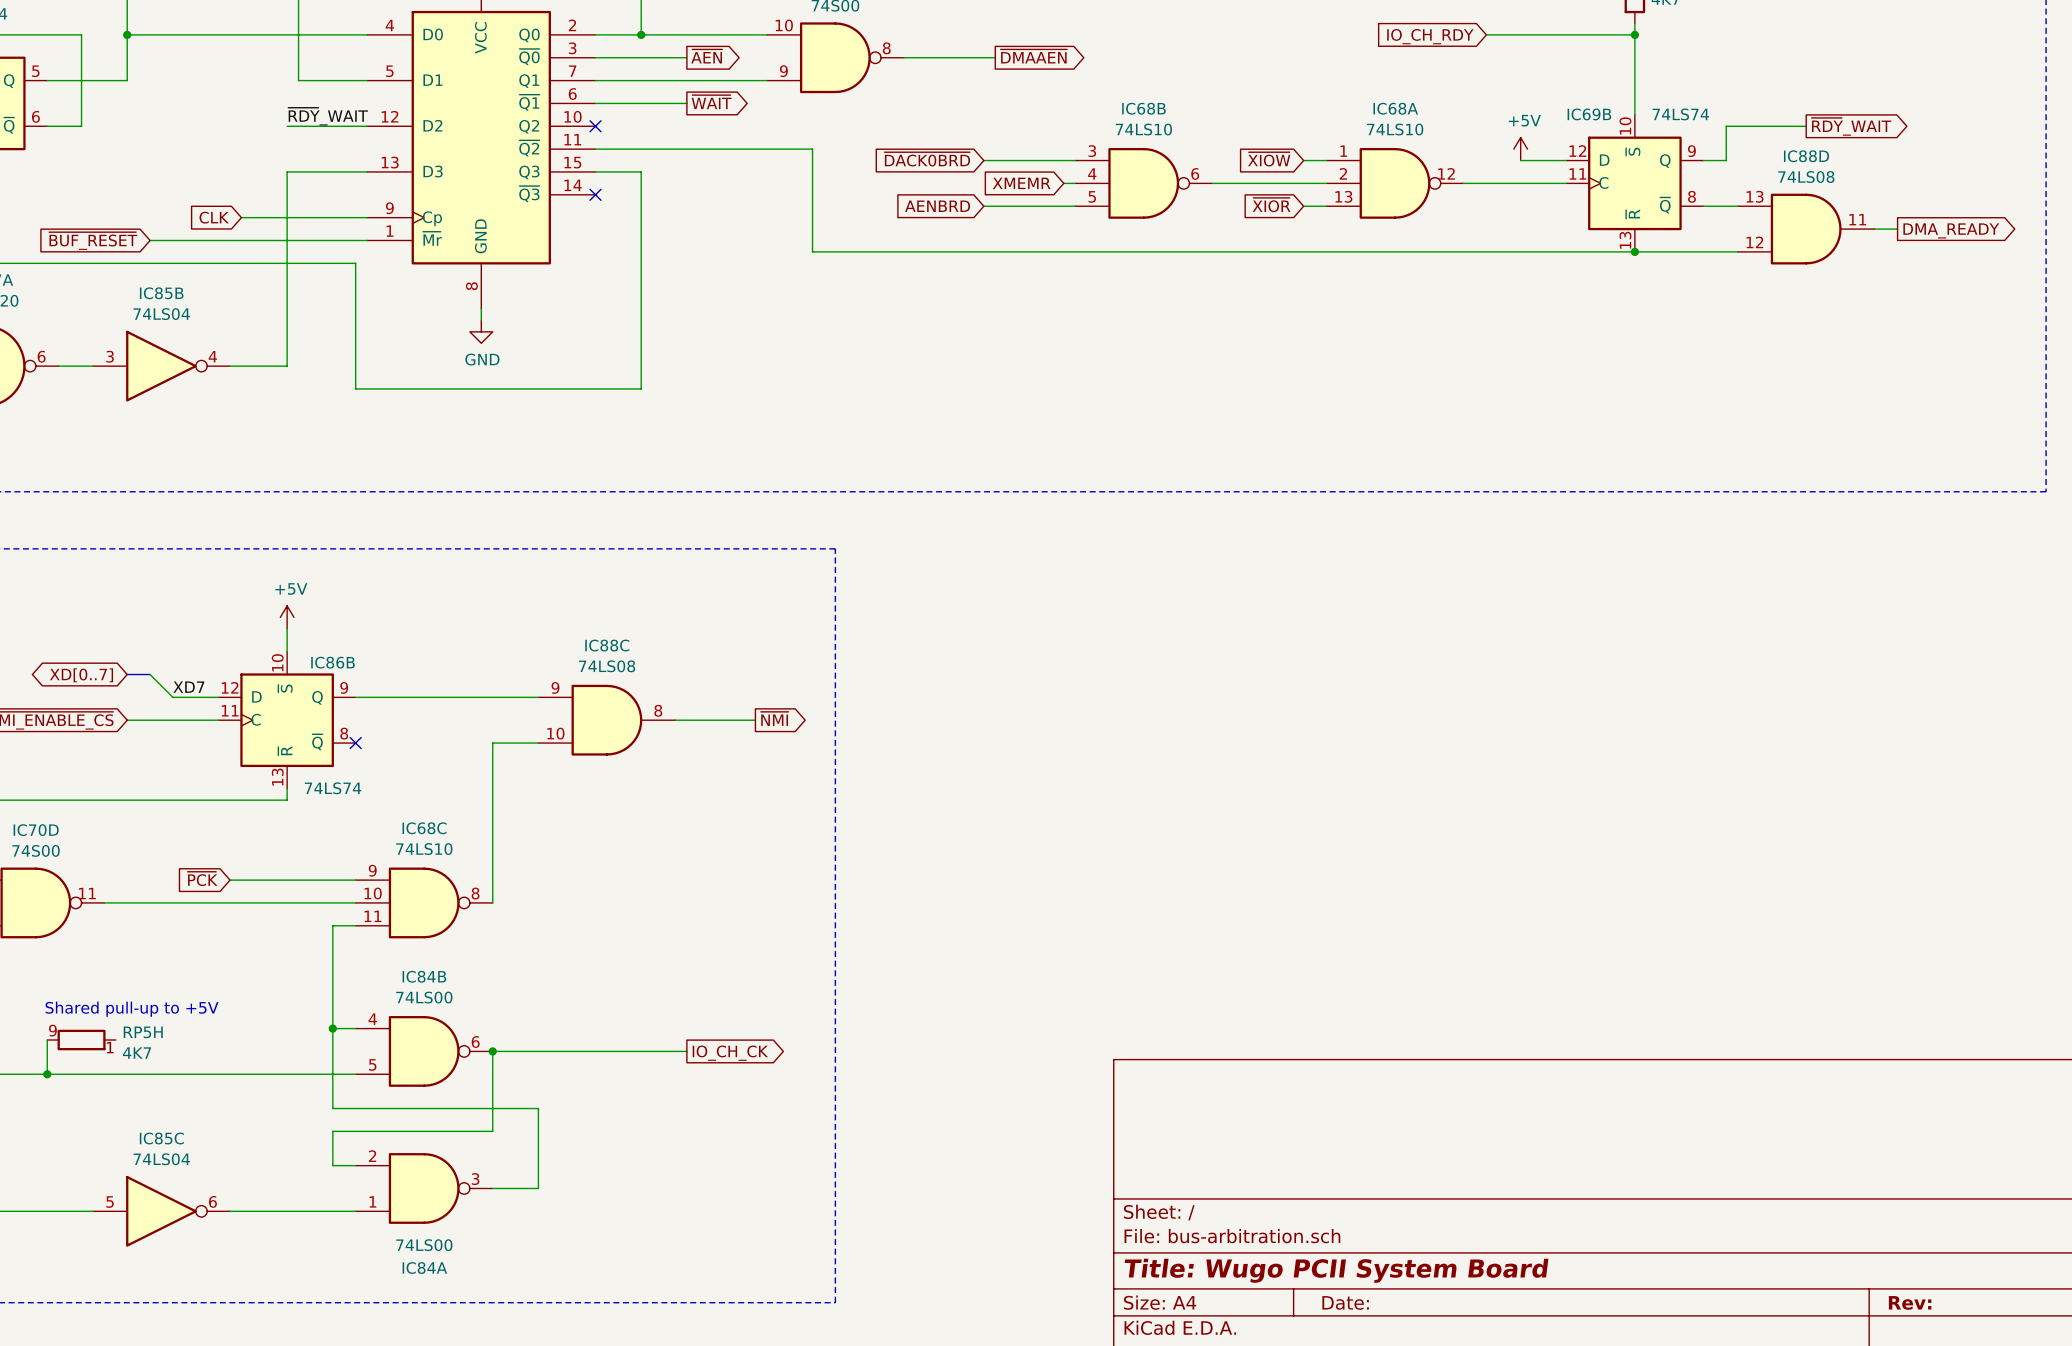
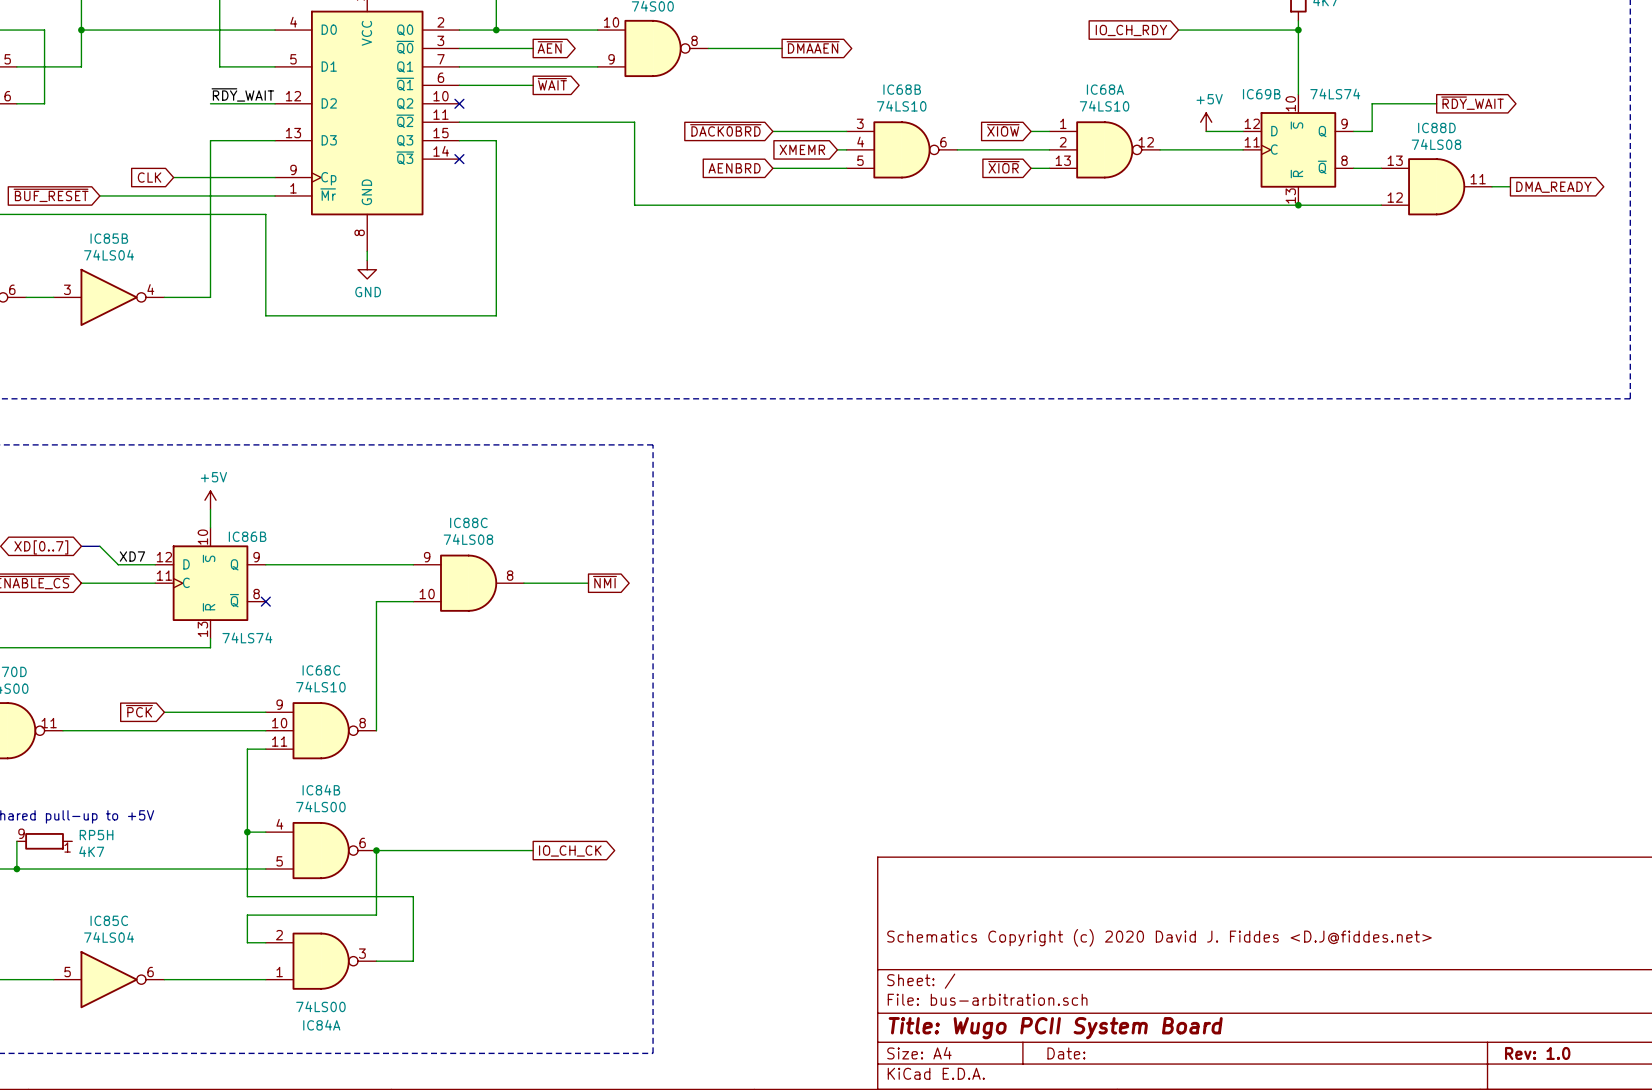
title block: none -> Schematics Copyright (c) 2020 David J. Fiddes <D.J@fiddes.net> (1159, 937)
title block: Rev: (1910, 1302) -> Rev: 1.0 (1537, 1053)

